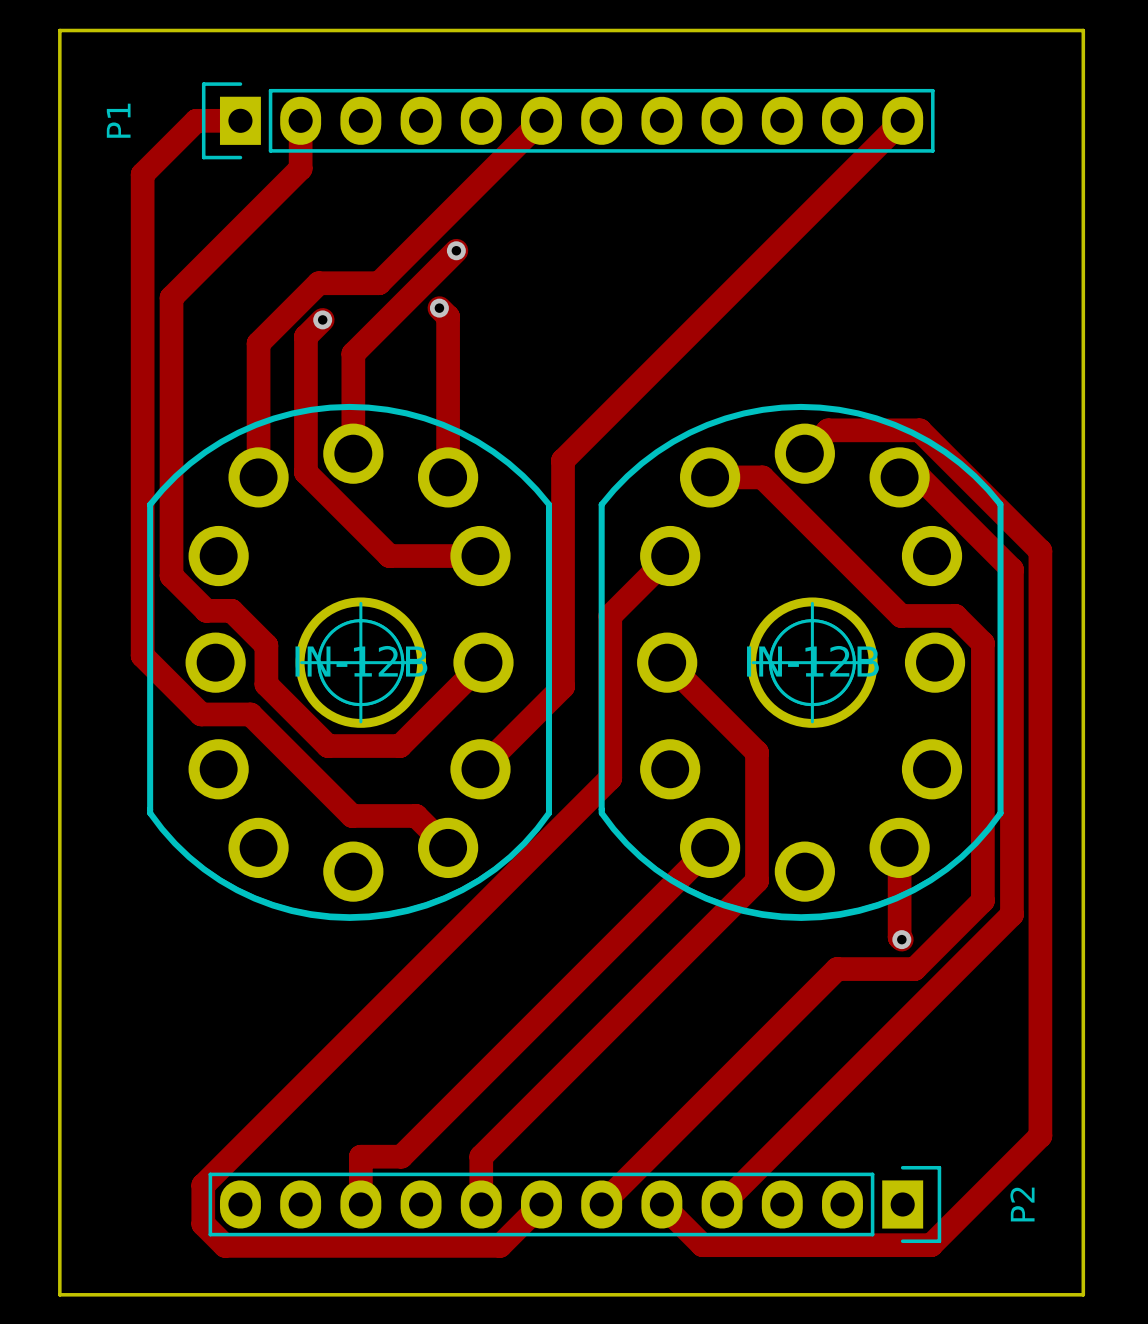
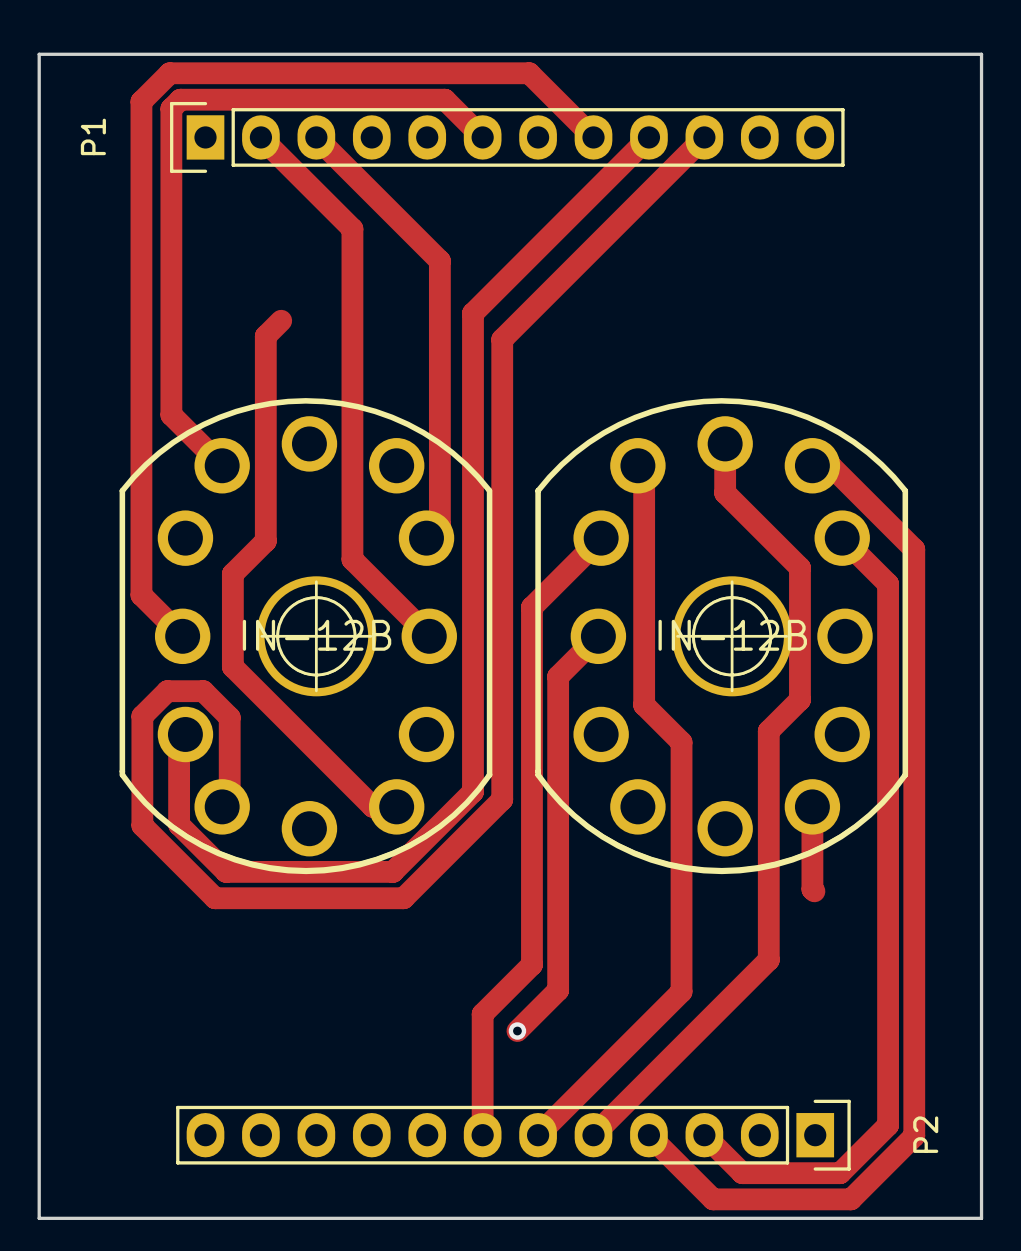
track: (240, 120) (196, 120) (142, 174) (142, 655) (201, 714) (250, 714) (352, 815) (416, 815) (448, 847) -> none
track: (300, 120) (300, 168) (171, 297) (171, 575) (206, 610) (231, 610) (266, 645) (266, 684) (328, 746) (400, 746) (483, 662) -> (260, 137) (352, 228) (352, 559) (429, 636)
track: none -> (316, 137) (439, 260) (439, 524) (426, 538)
track: (541, 120) (379, 283) (318, 283) (258, 343) (258, 477) -> (482, 137) (444, 99) (180, 99) (171, 108) (171, 414) (222, 465)
track: none -> (593, 137) (529, 73) (169, 73) (141, 101) (141, 595) (182, 636)
track: none -> (648, 137) (472, 313) (472, 791) (392, 871) (226, 871) (179, 824) (179, 740) (185, 734)
track: none -> (704, 137) (502, 339) (502, 799) (403, 898) (215, 898) (142, 825) (142, 716) (167, 691) (203, 691) (229, 717) (229, 799) (222, 806)
track: (902, 120) (563, 460) (563, 686) (480, 769) -> none
track: (456, 250) (353, 353) (353, 453) -> none
via: (456, 250) -> none
track: (439, 308) (448, 316) (448, 477) -> none
via: (439, 308) -> none
via: (322, 319) -> none
track: (804, 453) (828, 430) (919, 430) (1040, 550) (1040, 1135) (931, 1245) (702, 1245) (661, 1204) -> (725, 443) (725, 493) (799, 567) (799, 699) (768, 731) (768, 959) (593, 1135)
track: (305, 472) (389, 556) (480, 556) -> (265, 461) (265, 541) (232, 573) (232, 666) (372, 806) (396, 806)
track: (710, 477) (762, 477) (901, 615) (955, 615) (982, 643) (982, 900) (914, 969) (837, 969) (757, 1048) -> (637, 465) (644, 472) (644, 704) (681, 742) (681, 991)
track: (919, 477) (1011, 569) (1011, 914) (722, 1204) -> (830, 465) (914, 549) (914, 1136) (851, 1199) (713, 1199) (648, 1135)
track: none -> (842, 538) (888, 583) (888, 1125) (840, 1173) (742, 1173) (704, 1135)
track: (610, 615) (610, 778) (203, 1185) (203, 1224) (225, 1245) (500, 1245) (541, 1204) -> (545, 593) (531, 607) (531, 964) (482, 1014) (482, 1135)
track: (667, 662) (757, 752) (757, 880) (481, 1156) (481, 1204) -> (598, 636) (558, 676) (558, 990) (517, 1031)
track: (710, 847) (401, 1156) (360, 1156) (360, 1204) -> none
via: (901, 939) -> none
via: none -> (517, 1031)

